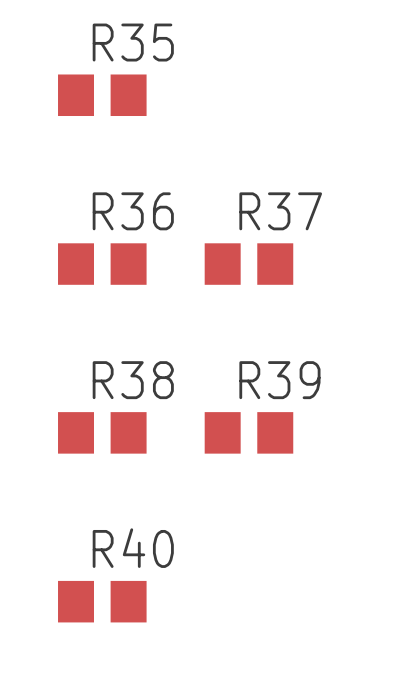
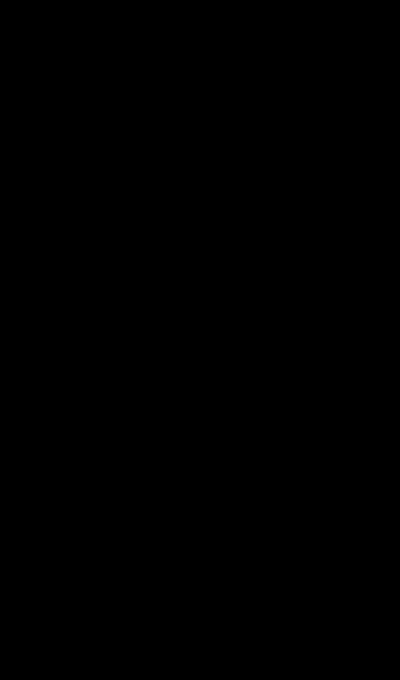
R35: (102, 95) -> none
R36: (102, 264) -> none
R37: (248, 264) -> none
R38: (102, 432) -> none
R39: (248, 432) -> none
R40: (102, 601) -> none

